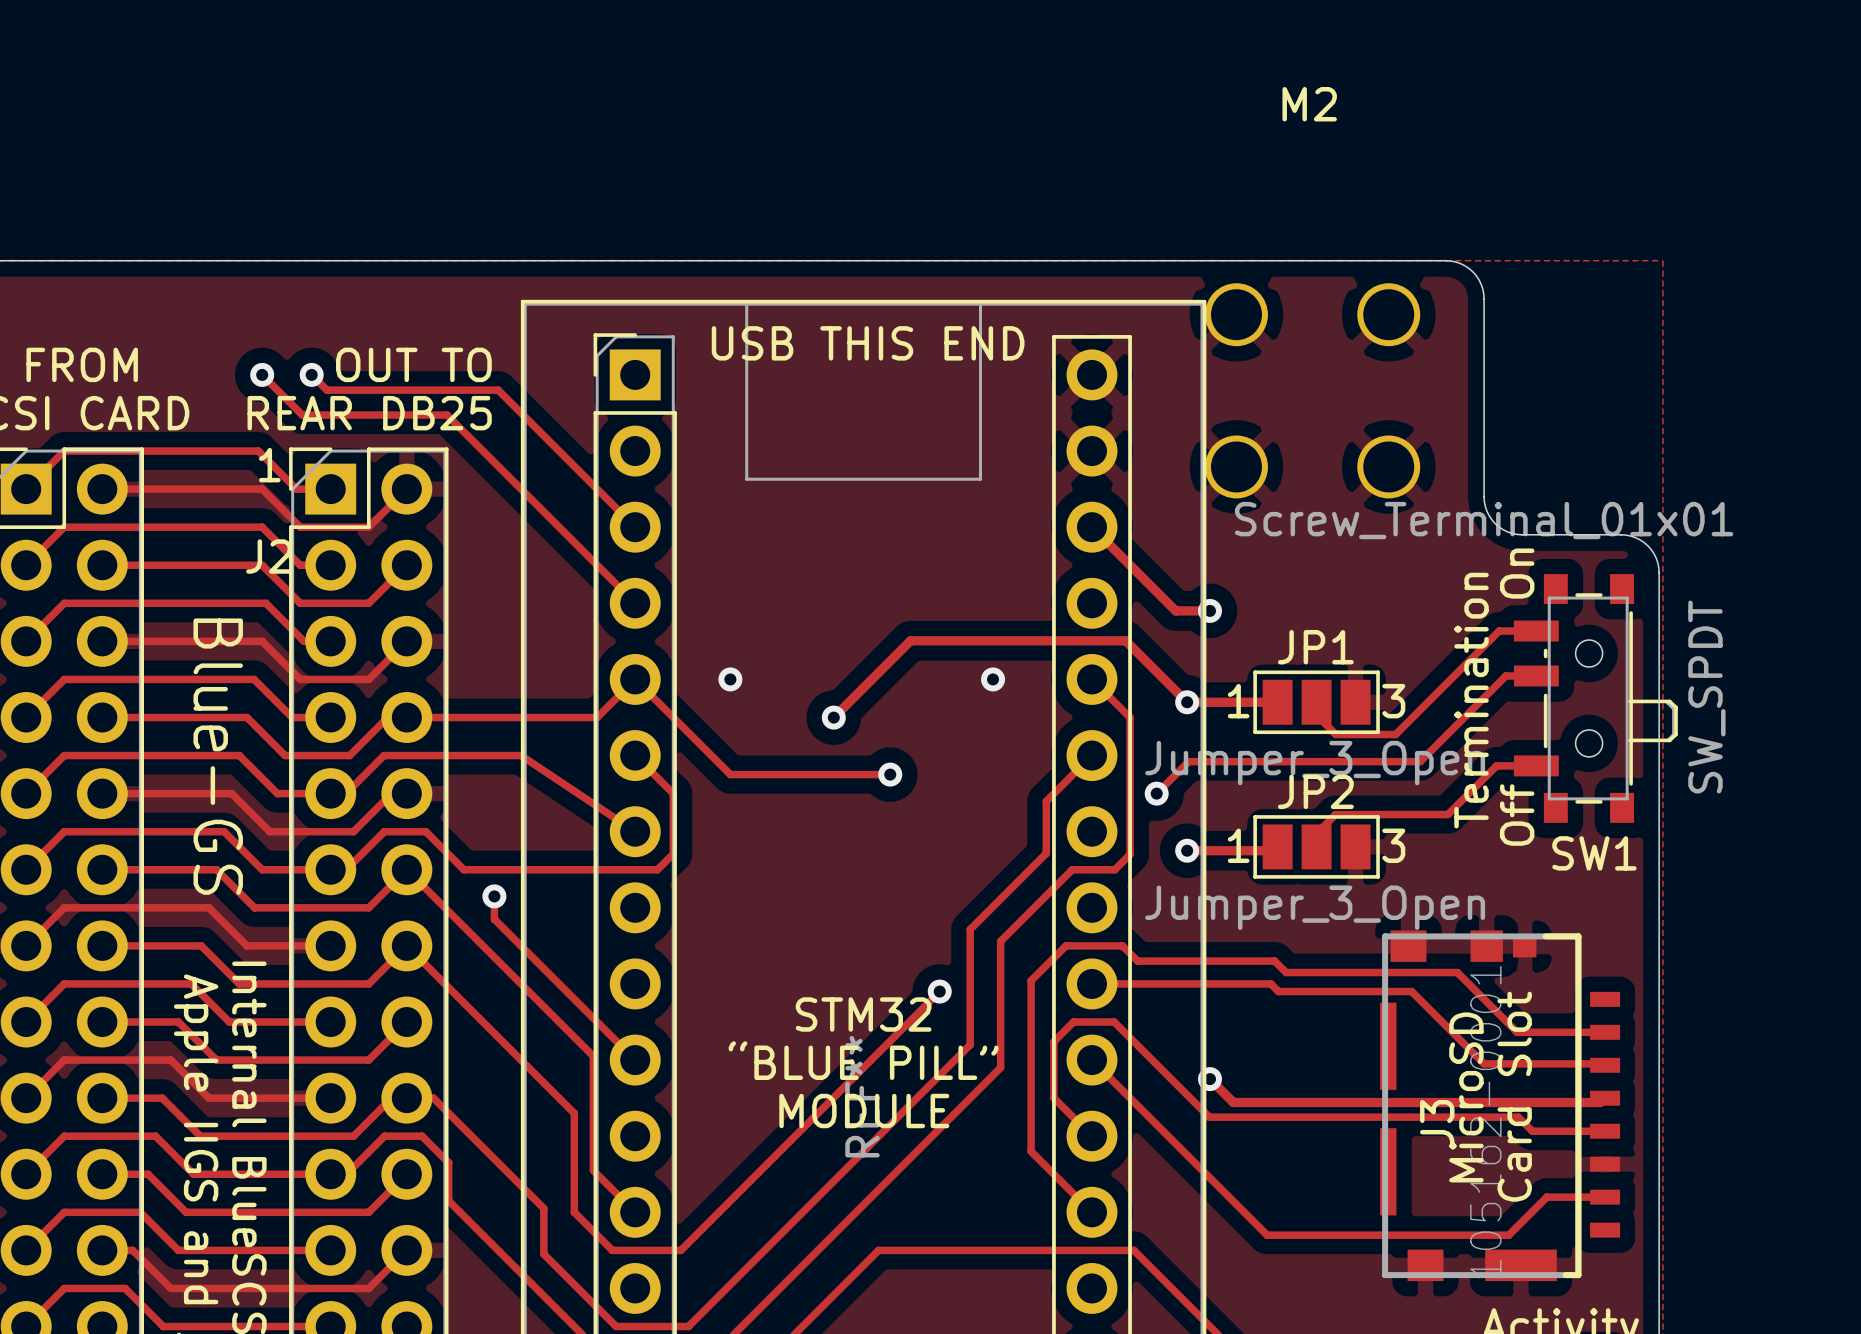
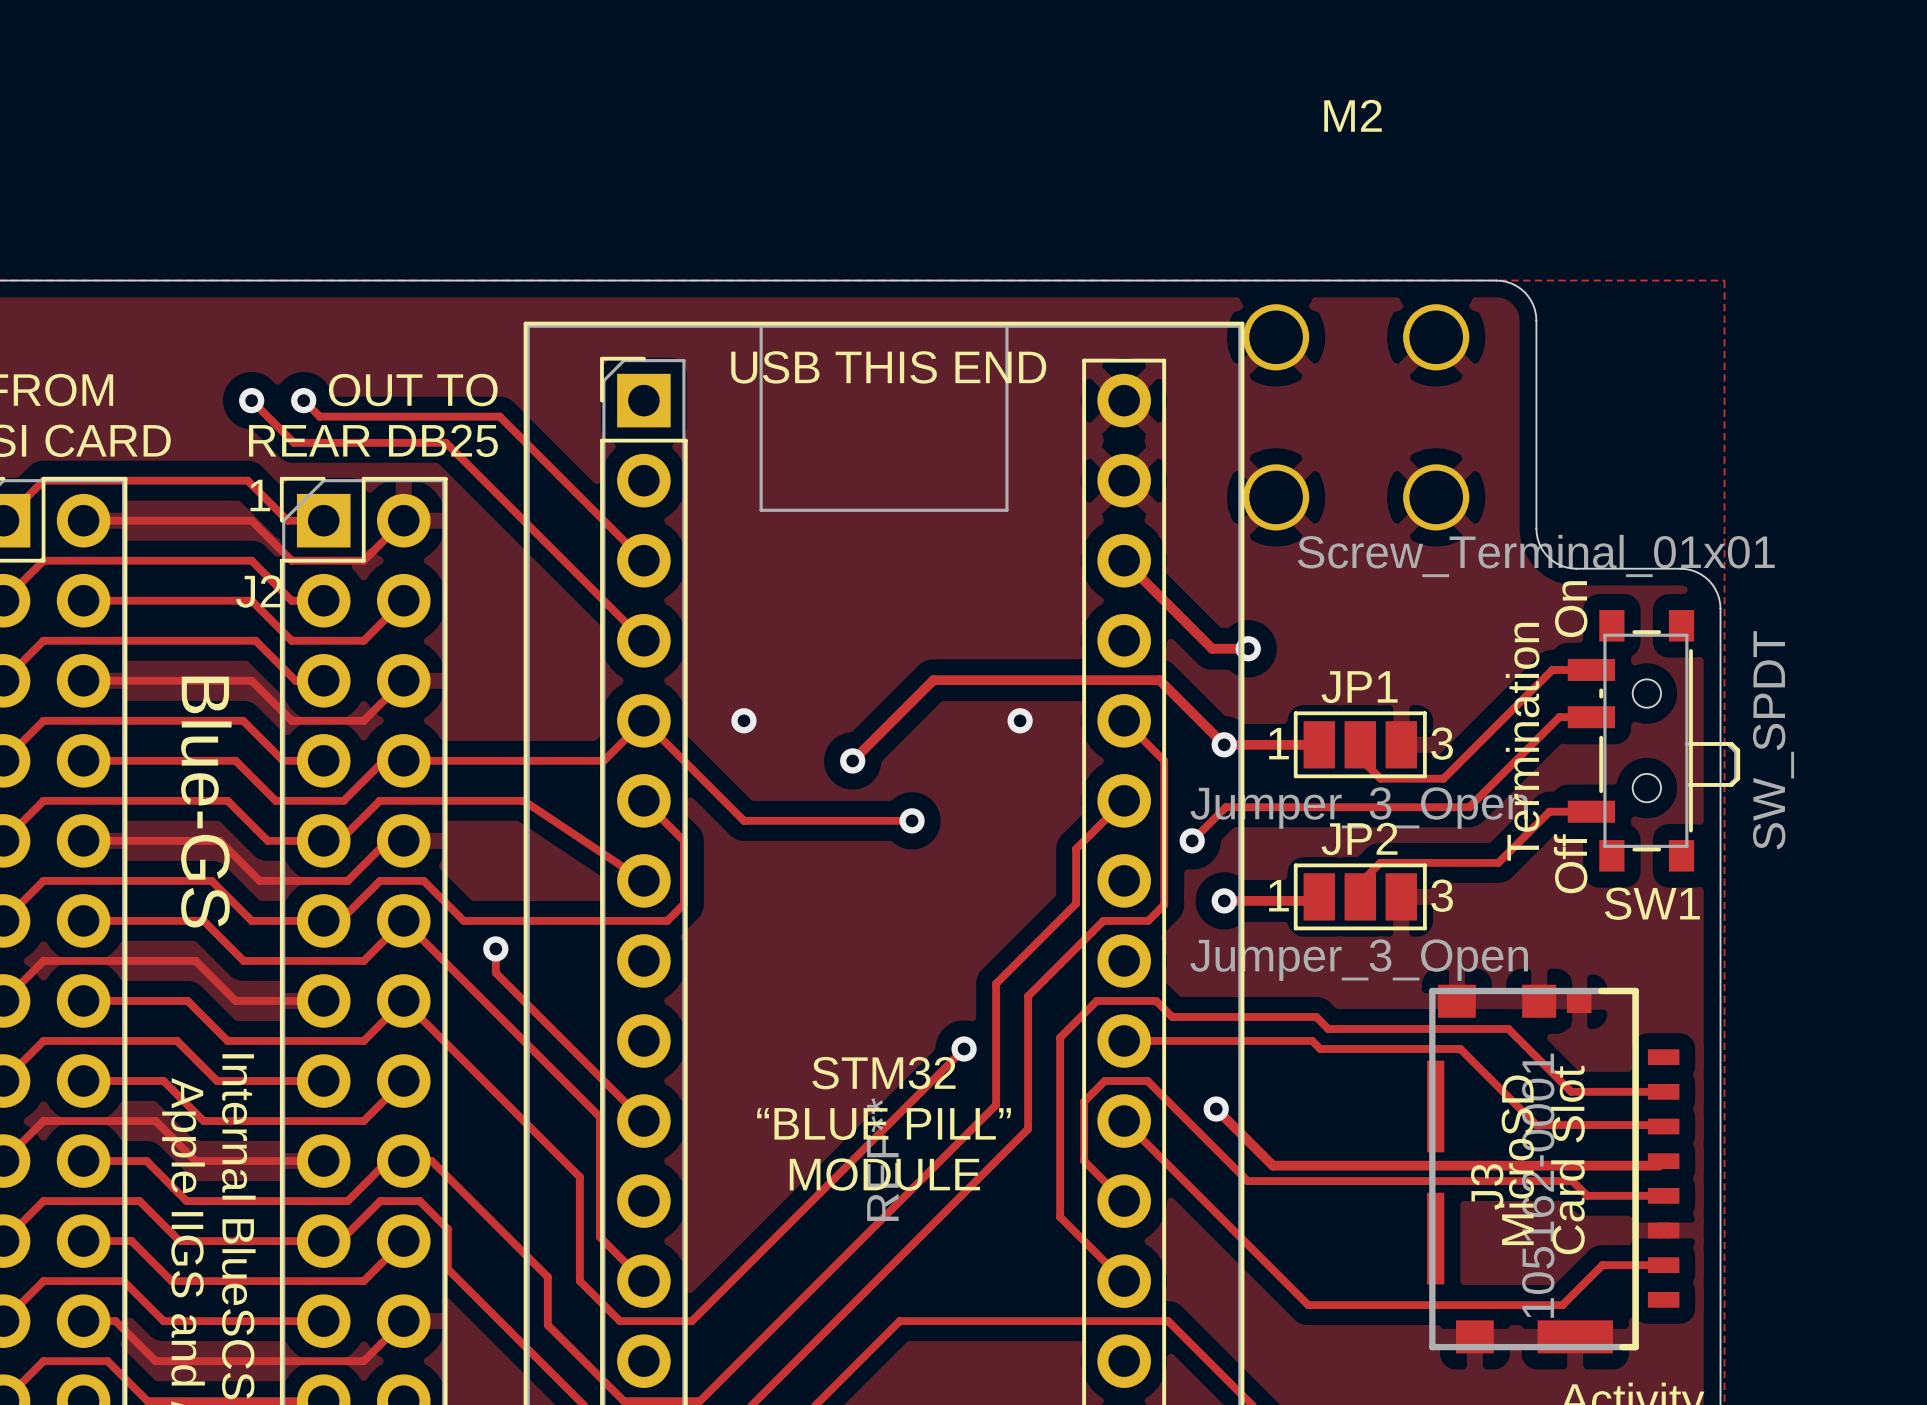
track: none -> (1216, 1109) (1248, 1141)
via position: (1210, 1079) -> (1216, 1109)

